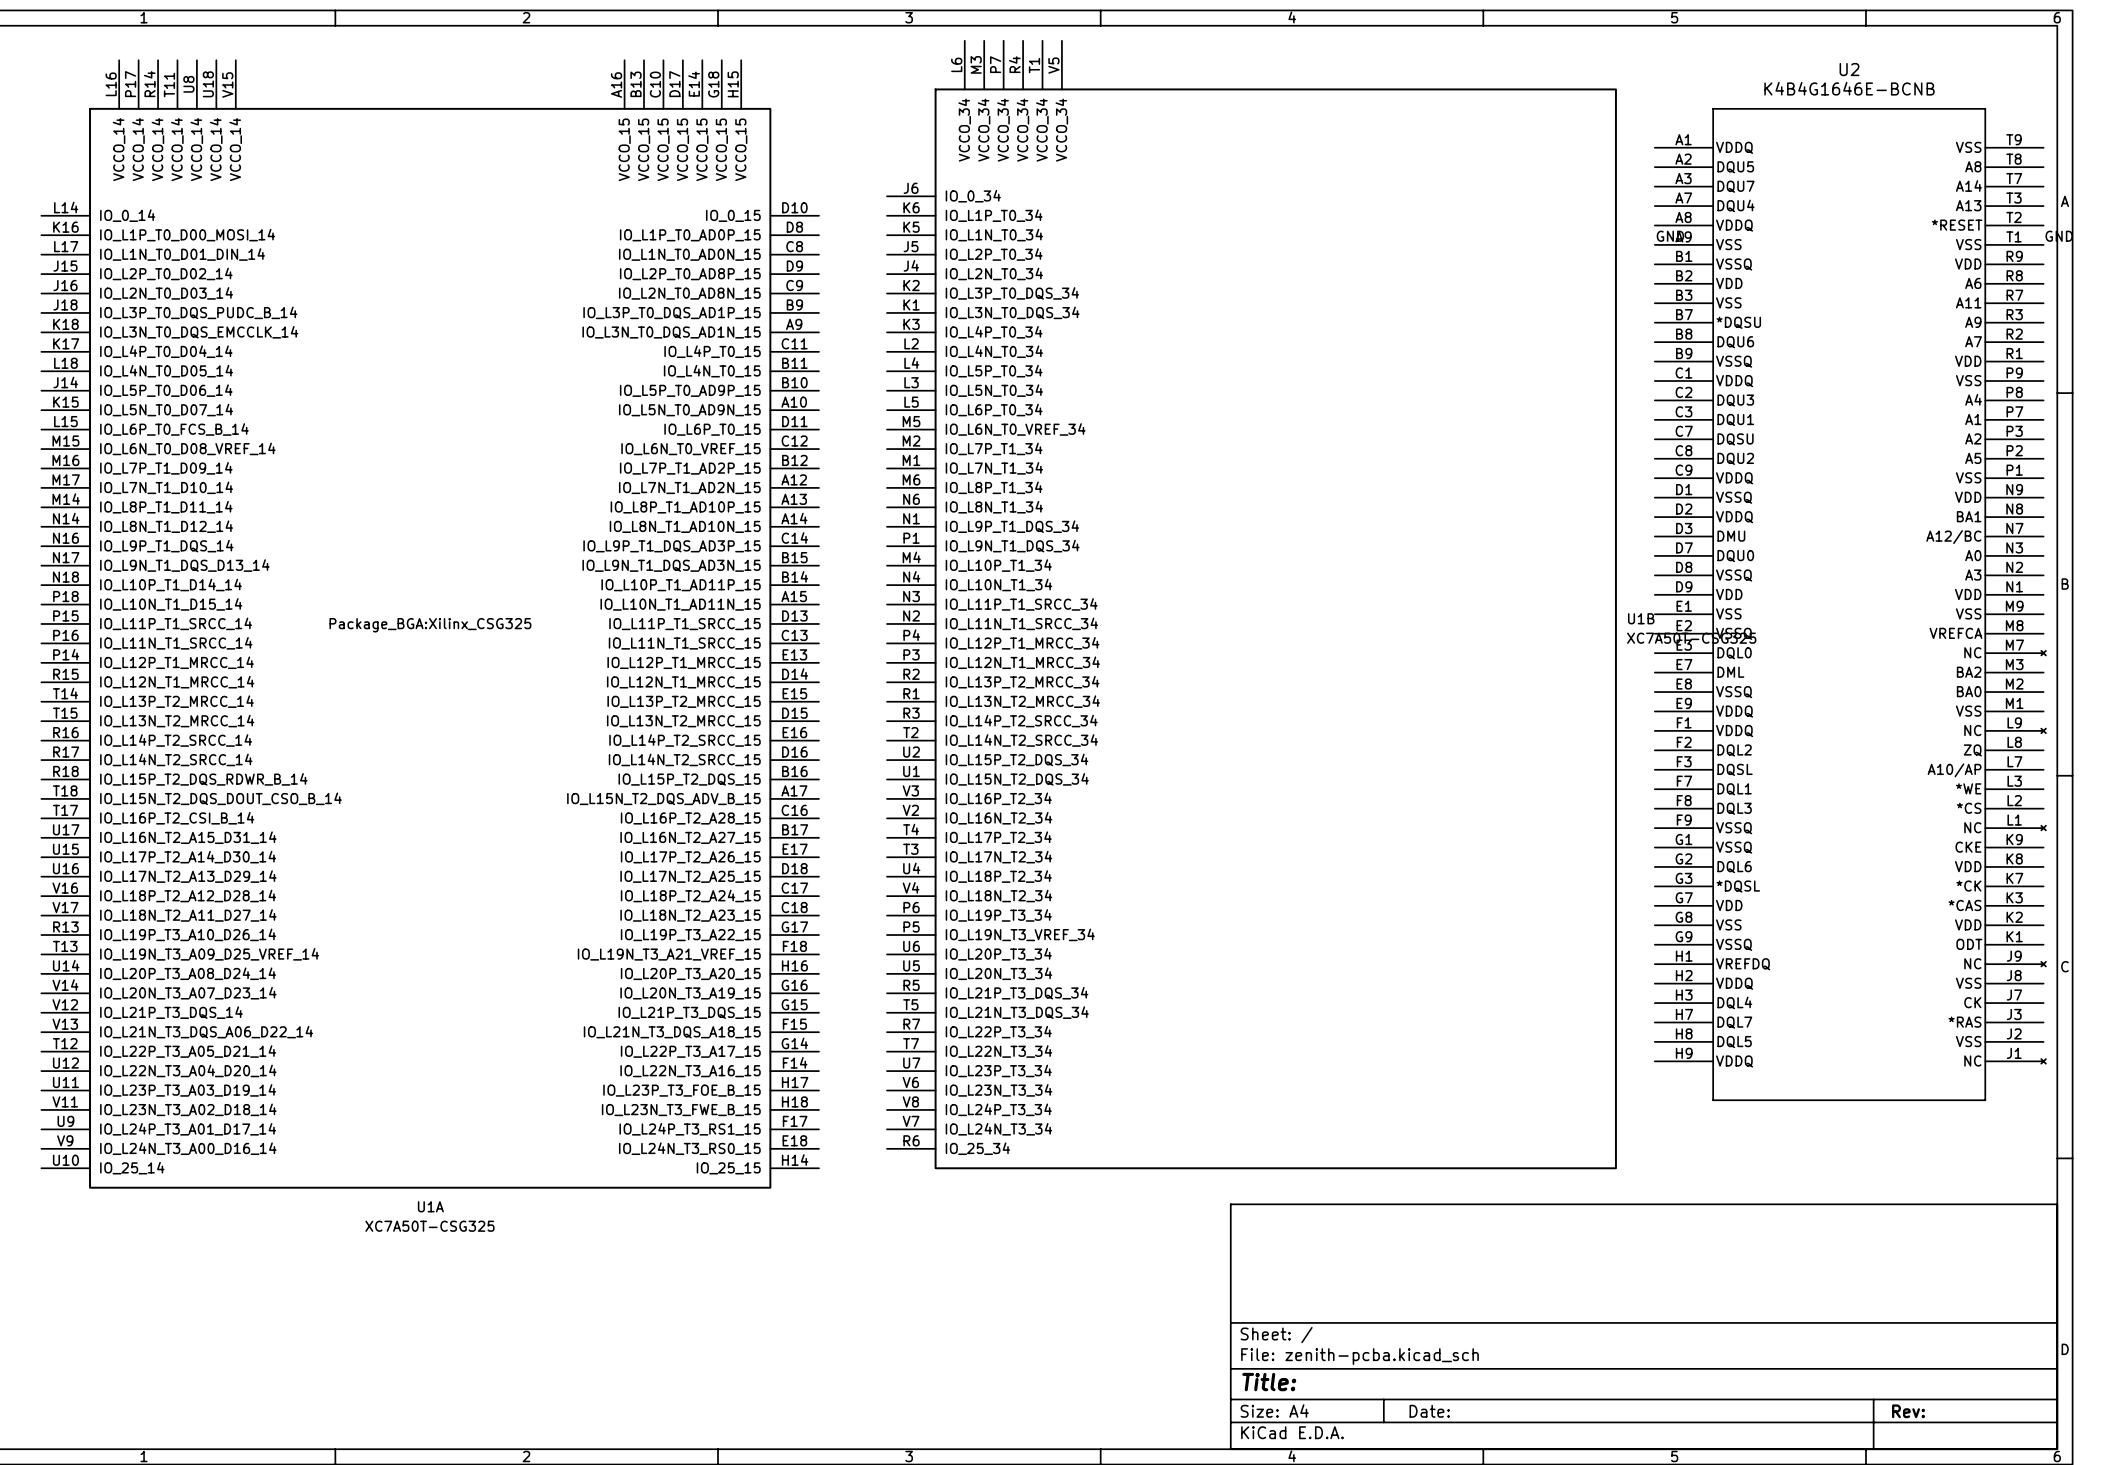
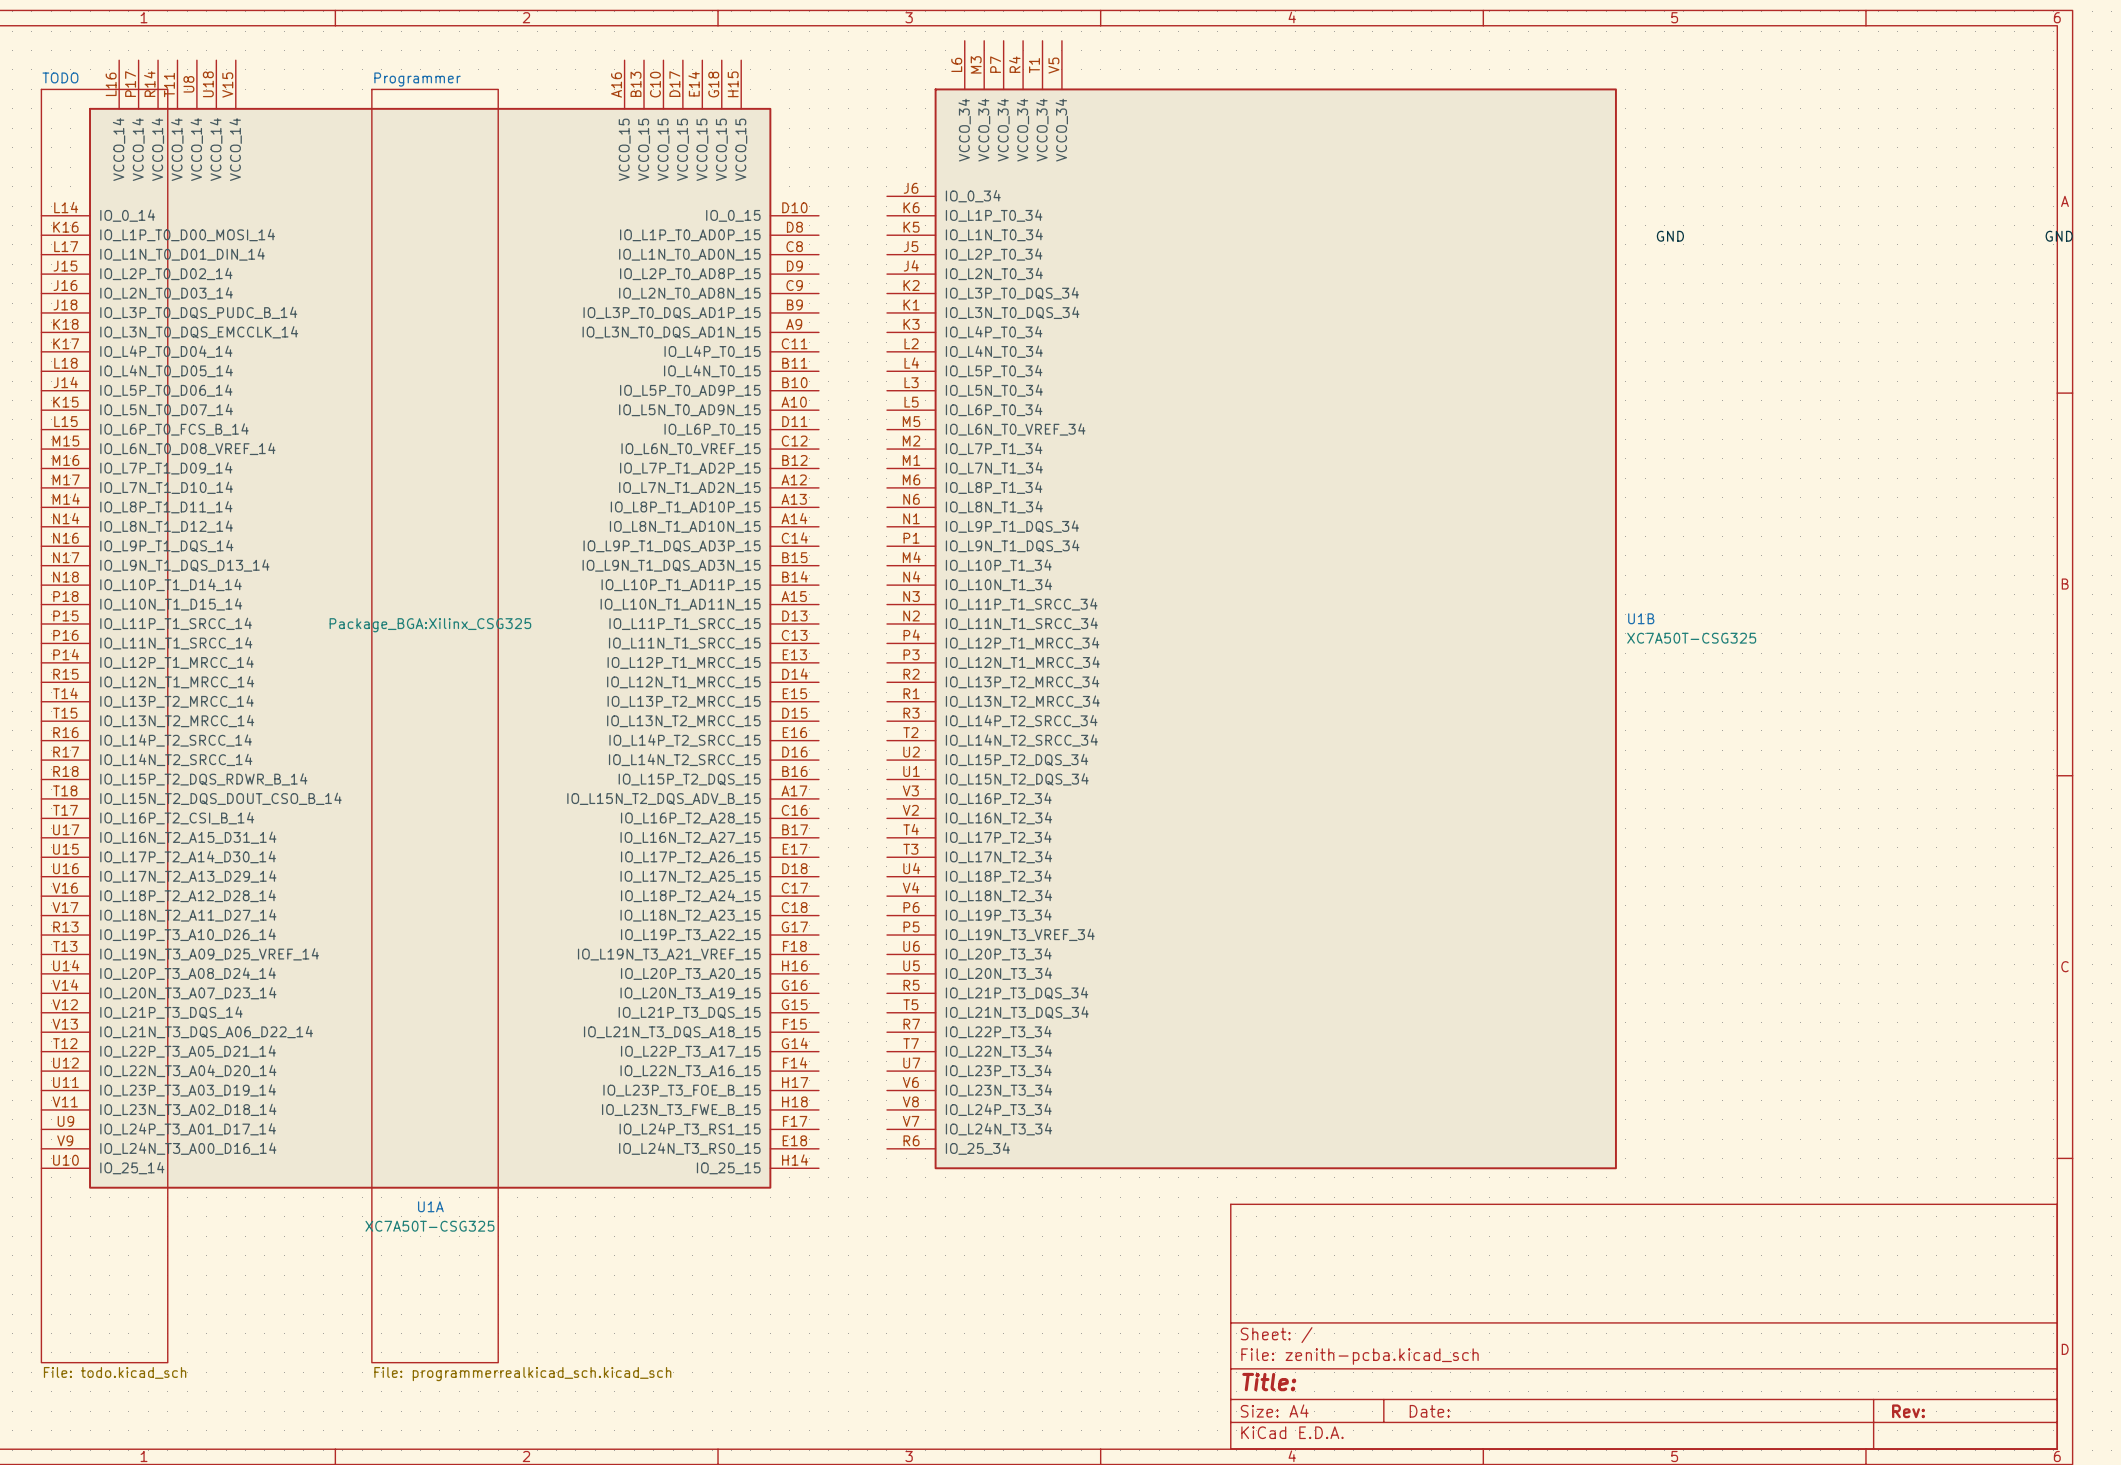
U2: K4B4G1646E-BCNB (1850, 604) -> none
sheet TODO: none -> File: todo.kicad_sch (104, 726)
sheet Programmer: none -> File: programmerrealkicad_sch.kicad_sch (435, 726)

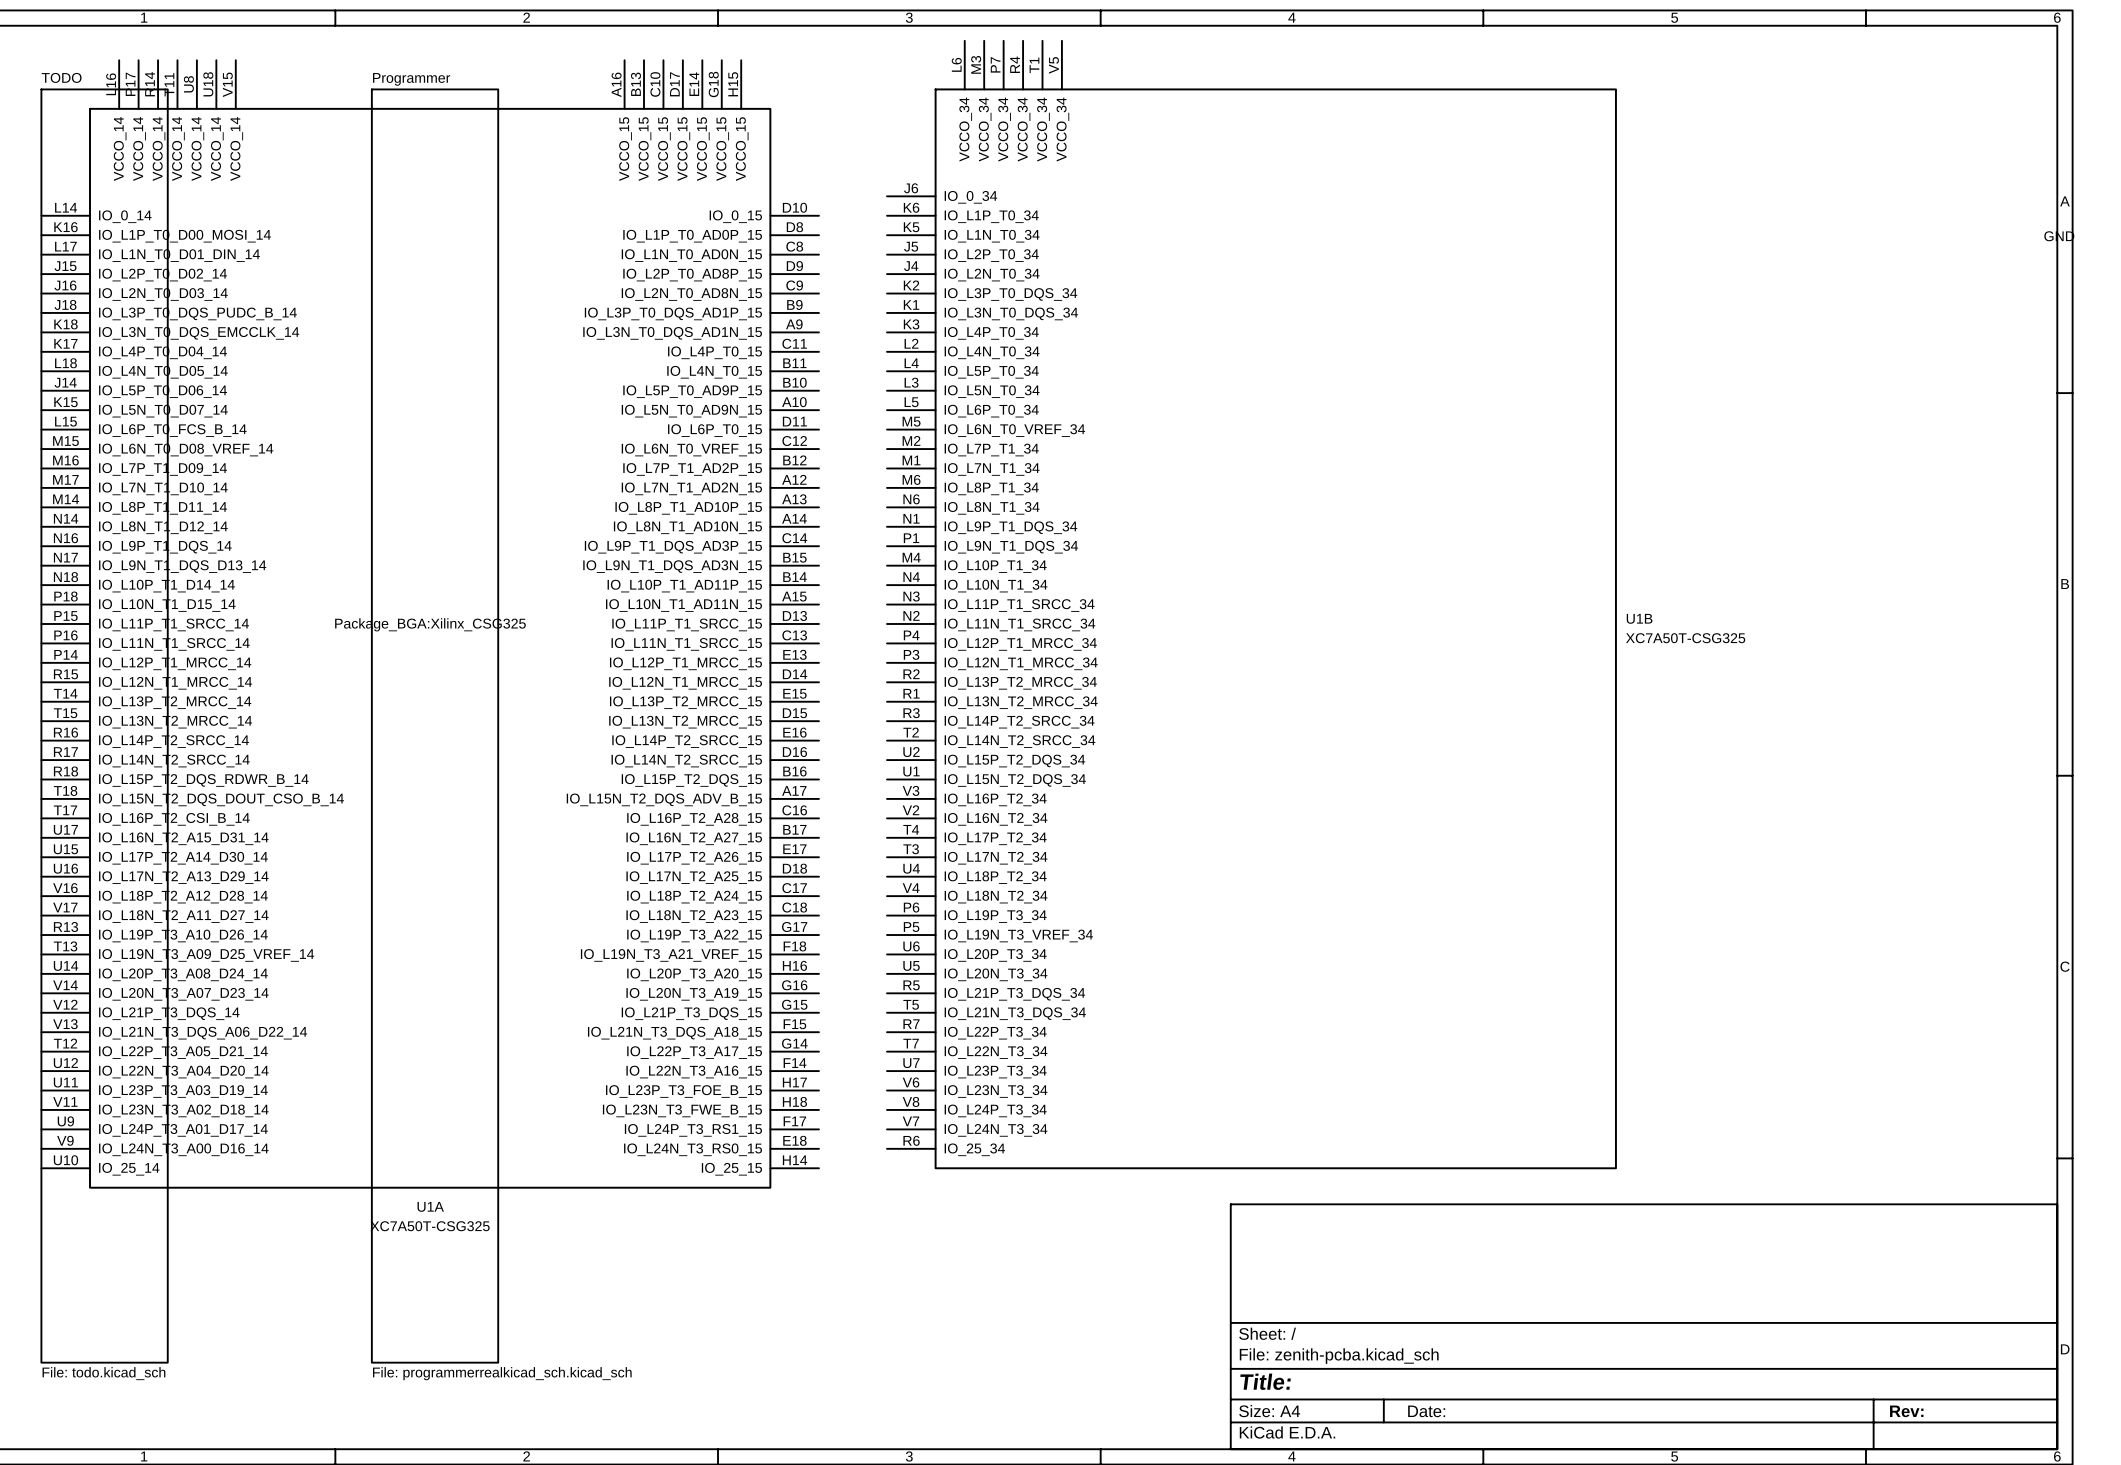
label: GND (1670, 236) -> none

